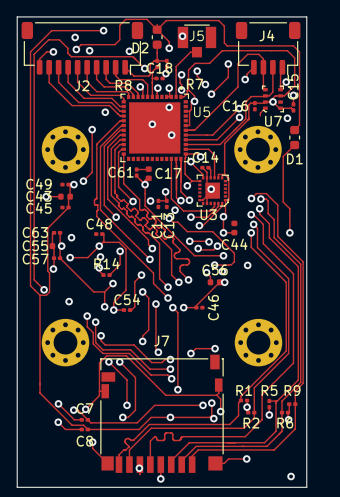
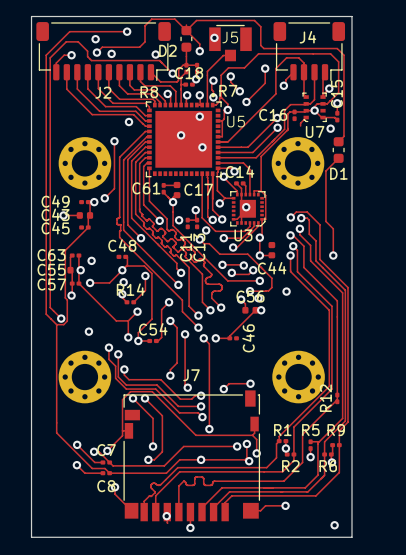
R12: none -> (337, 398)

